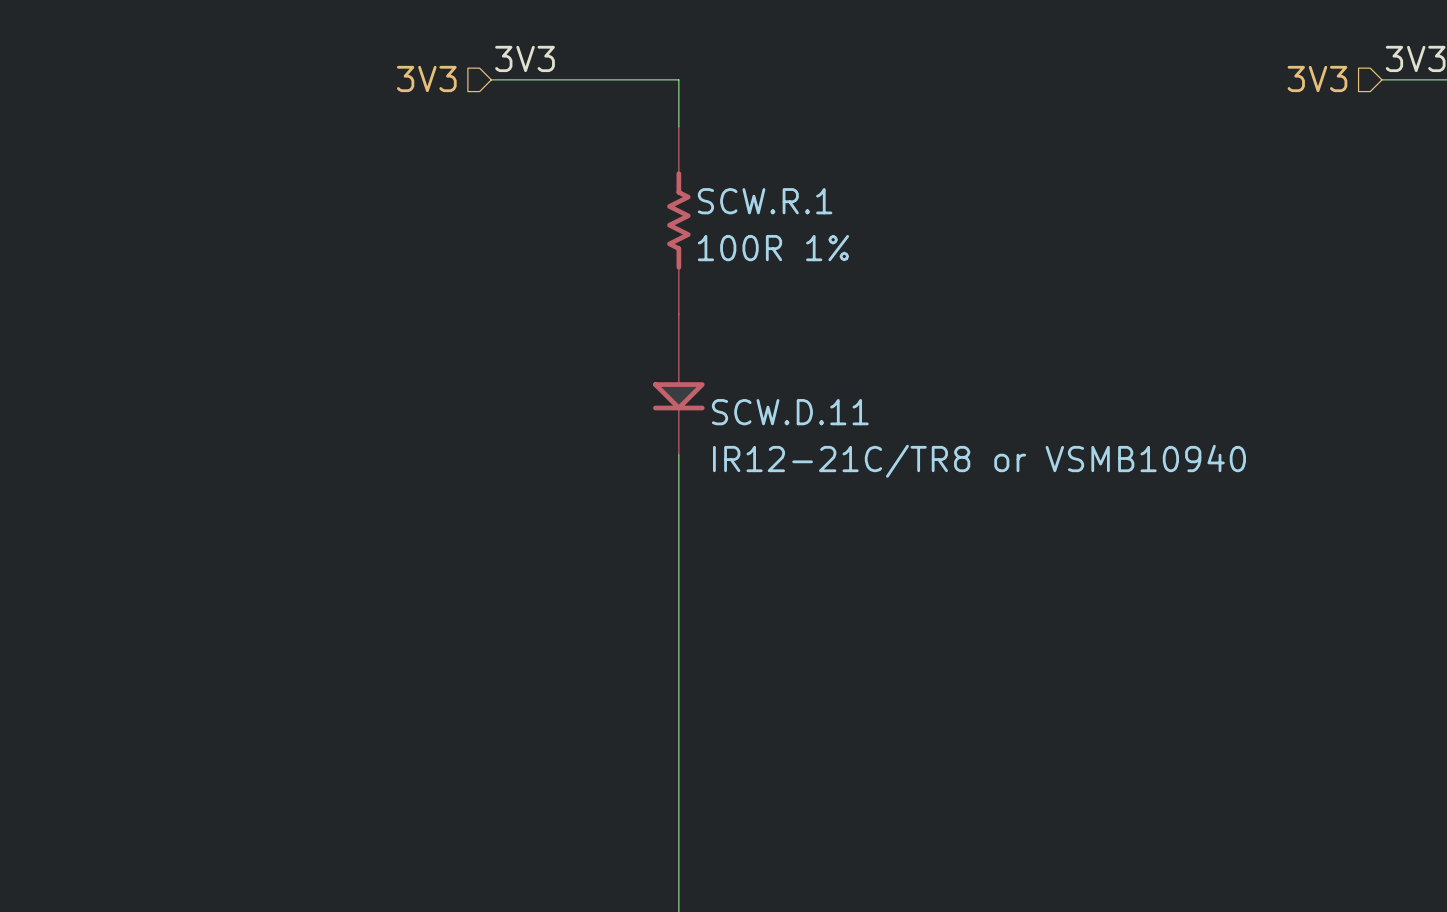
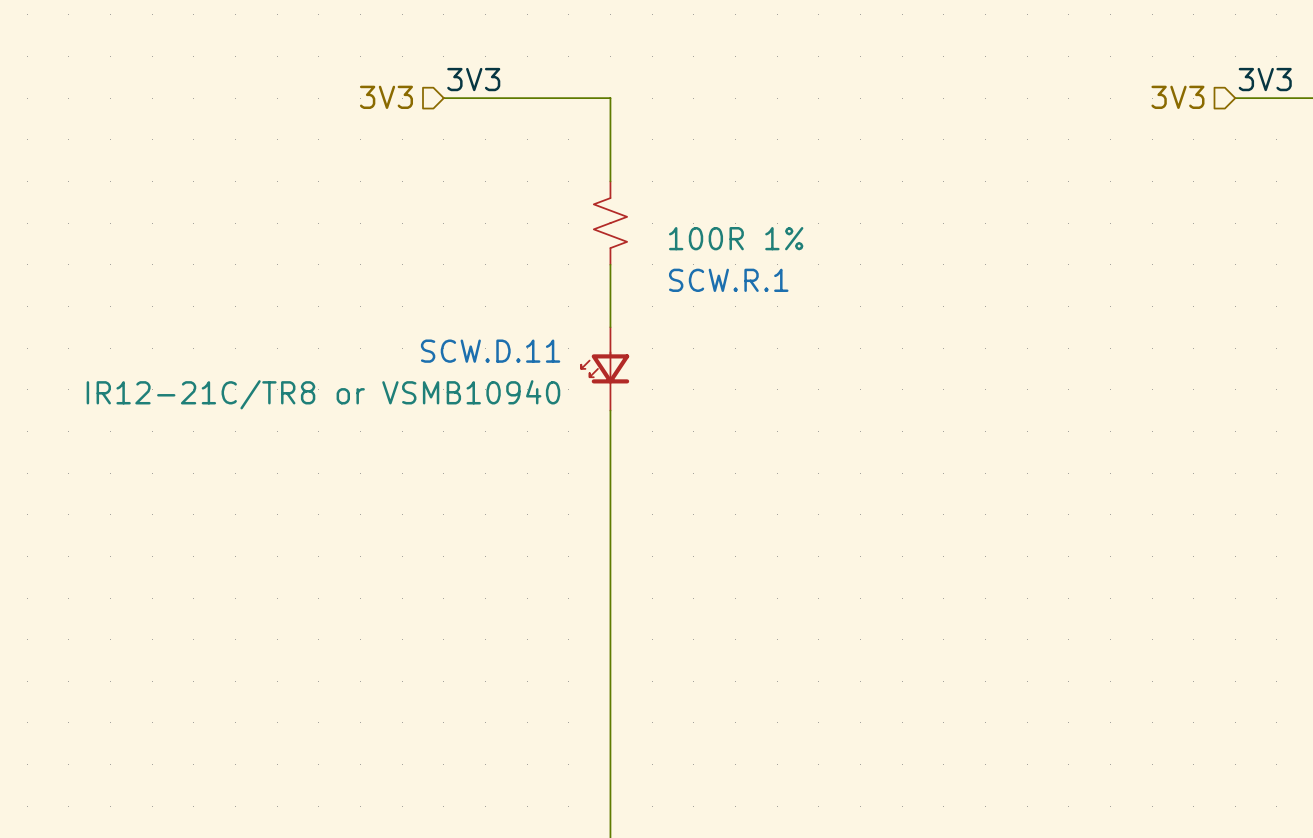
SCW.R.1 symbol: [667, 126, 691, 315] -> [593, 181, 628, 265]
SCW.R.1 name position: SCW.R.1 (765, 201) -> SCW.R.1 (728, 280)
SCW.R.1 value position: 100R 1% (773, 248) -> 100R 1% (736, 238)
SCW.D.11 symbol: [653, 314, 705, 455] -> [581, 327, 630, 411]
SCW.D.11 name position: SCW.D.11 (790, 412) -> SCW.D.11 (490, 351)
SCW.D.11 value position: IR12-21C/TR8 or VSMB10940 (979, 461) -> IR12-21C/TR8 or VSMB10940 (323, 394)

